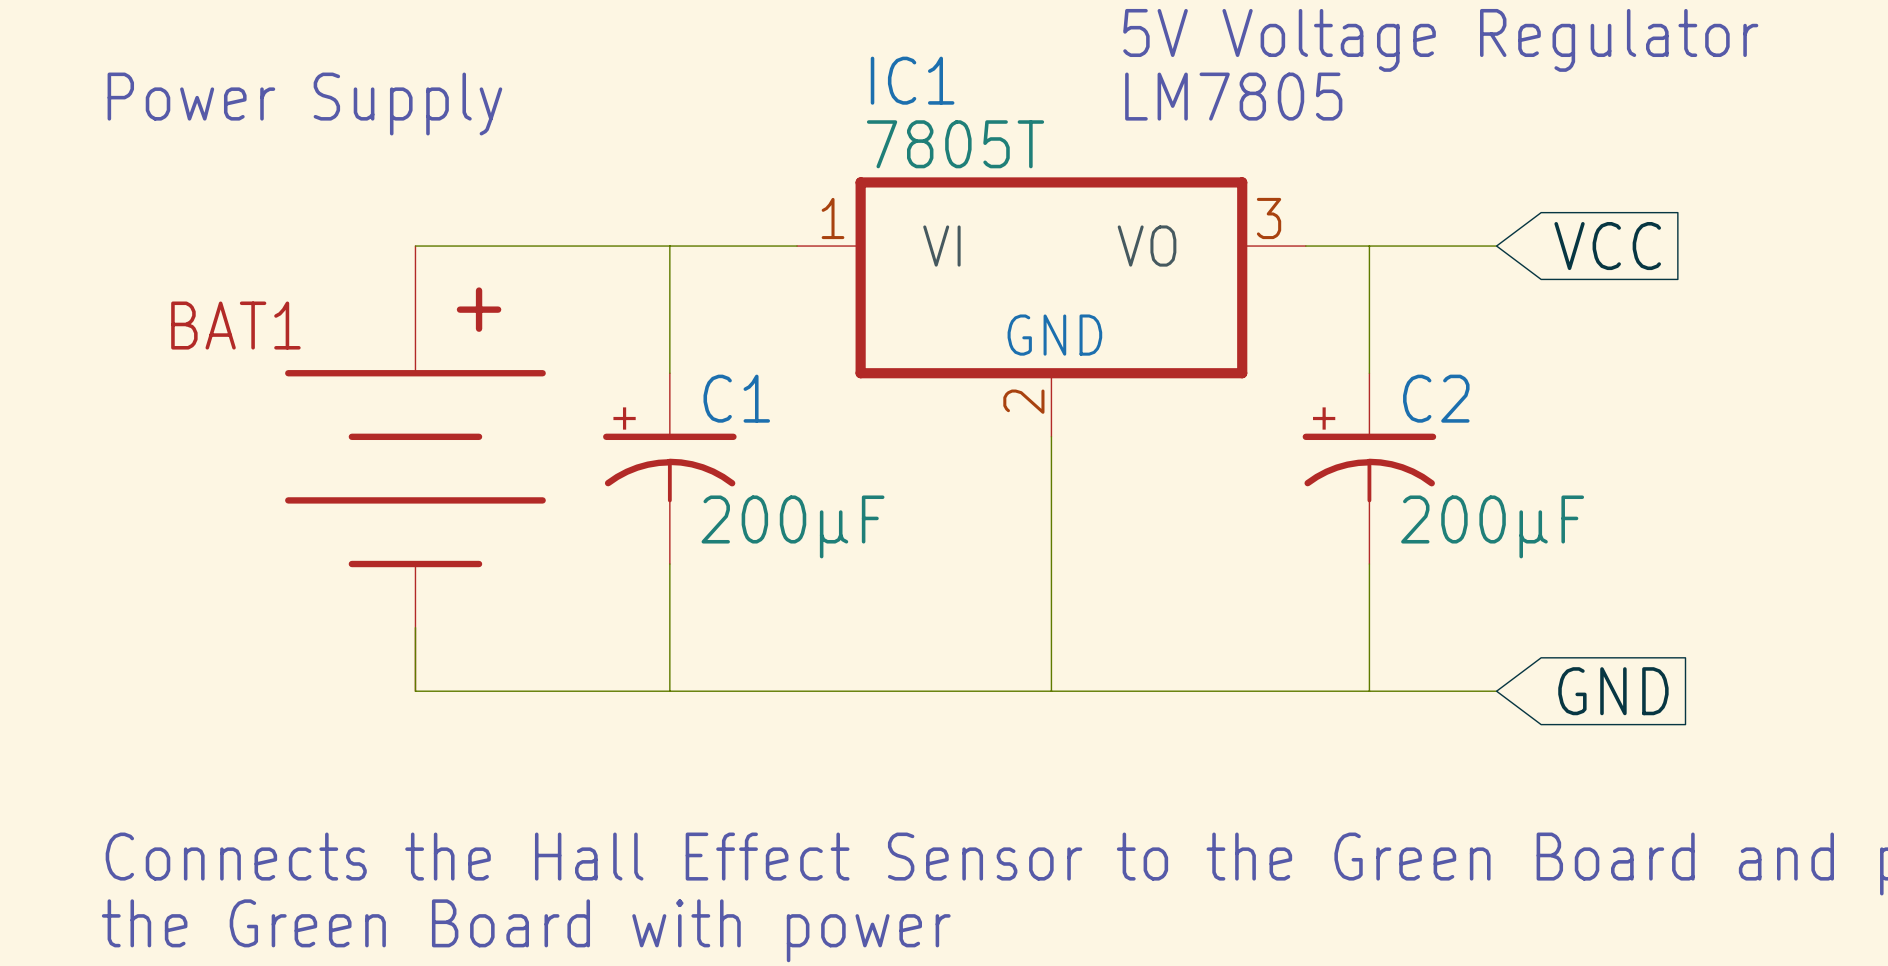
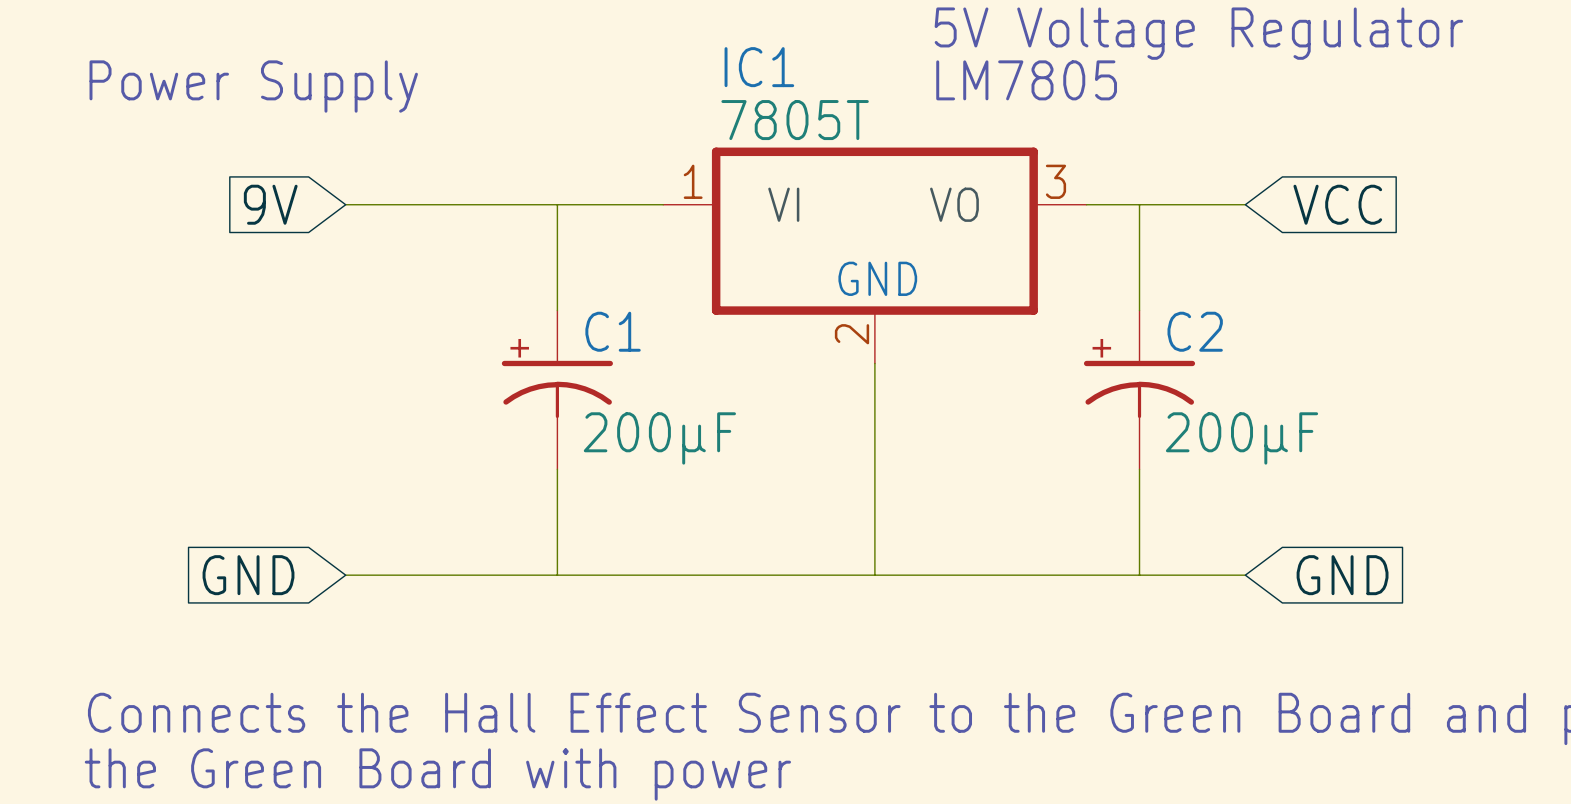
global label: none -> 9V (270, 204)
BAT1: (415, 468) -> none
wire: (415, 627) (415, 691) -> none
global label: none -> GND (248, 575)

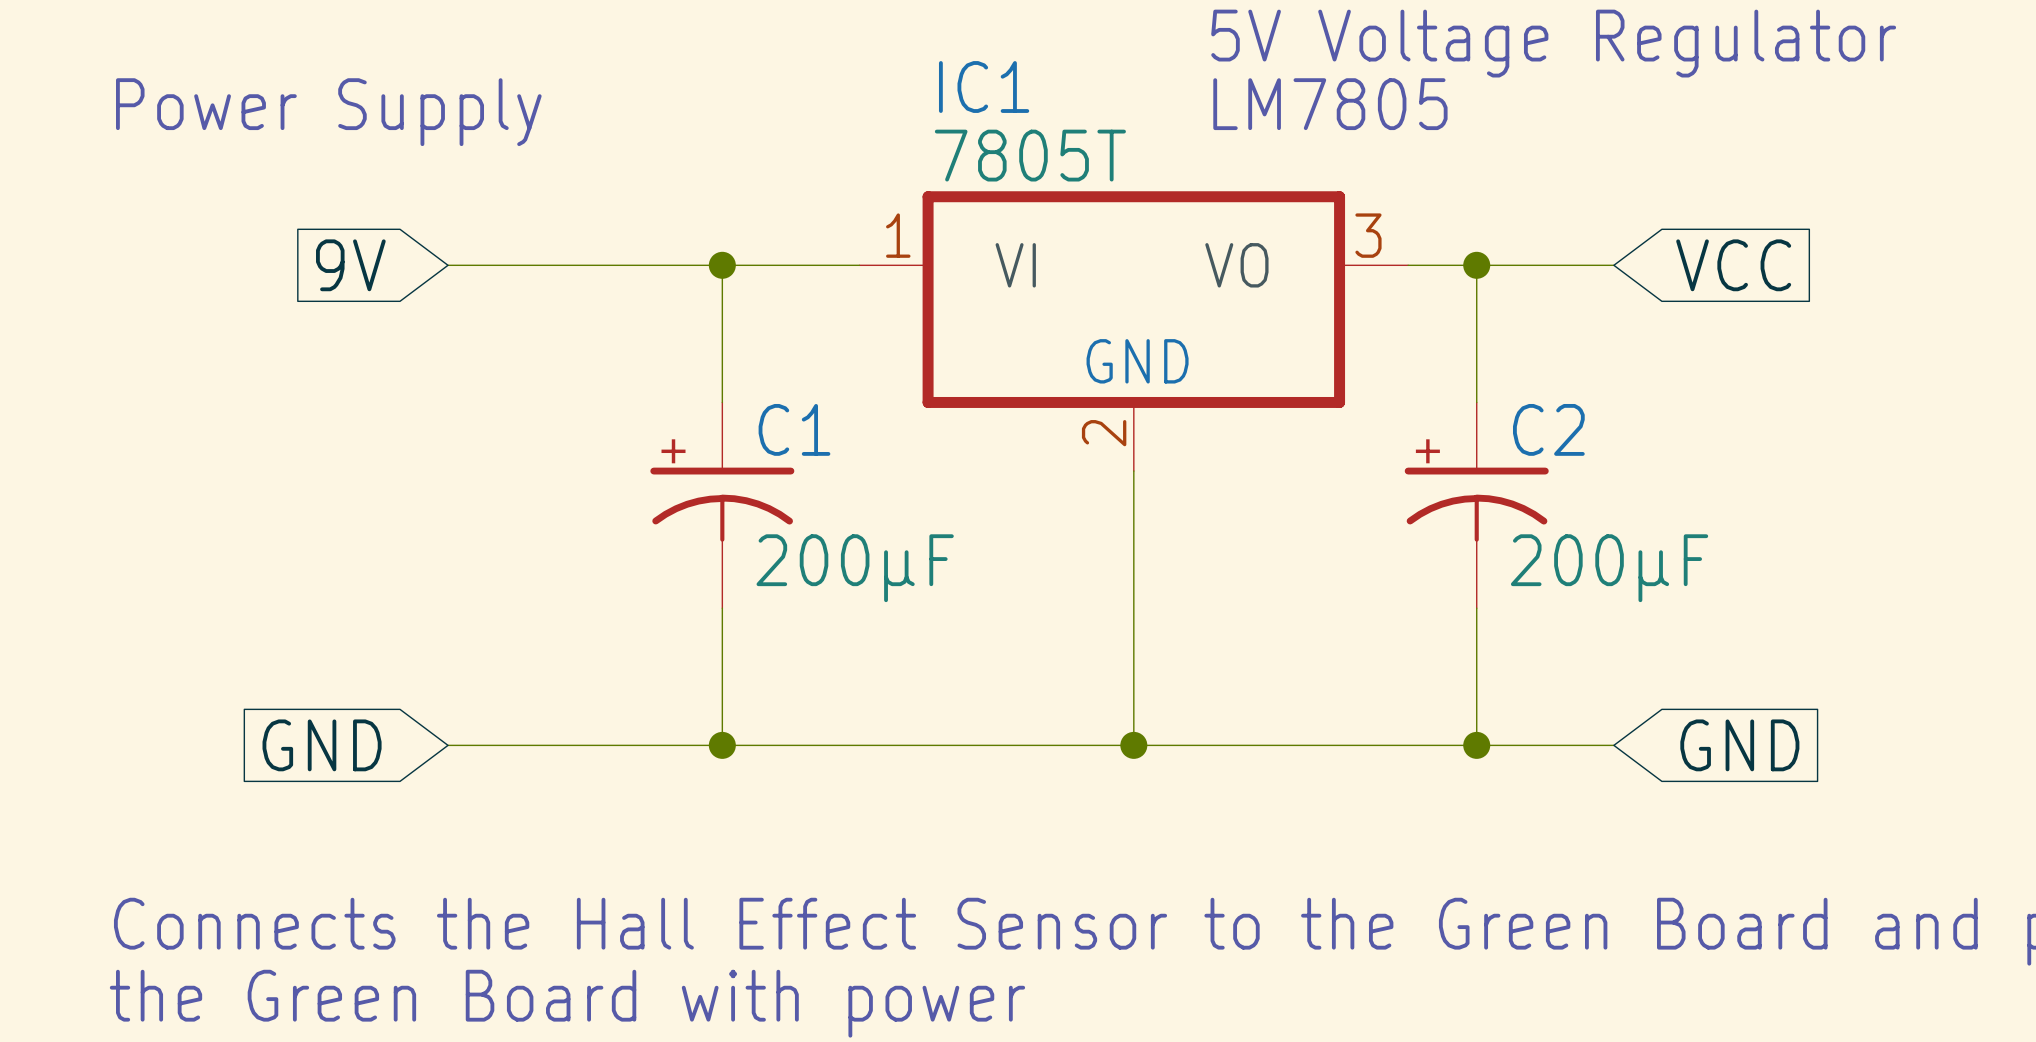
junction: none -> (722, 265)
junction: none -> (1476, 265)
junction: none -> (722, 745)
junction: none -> (1133, 745)
junction: none -> (1476, 745)

